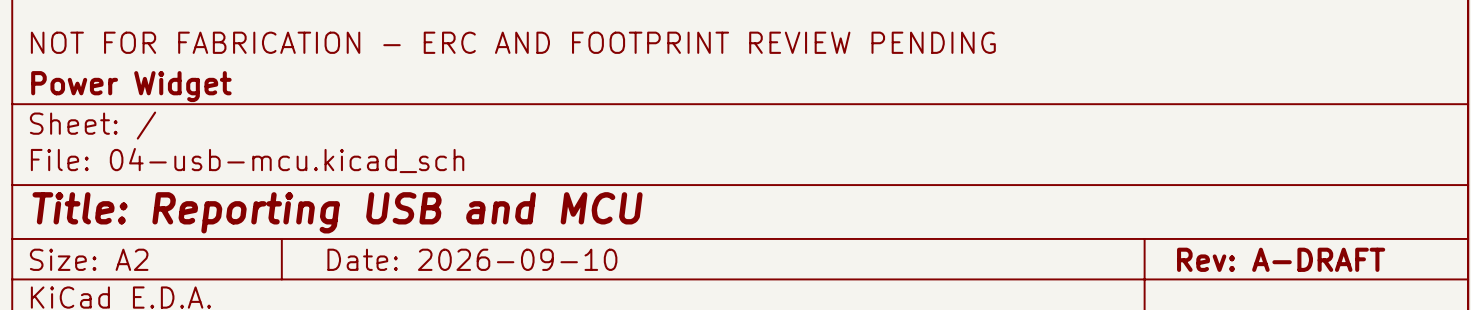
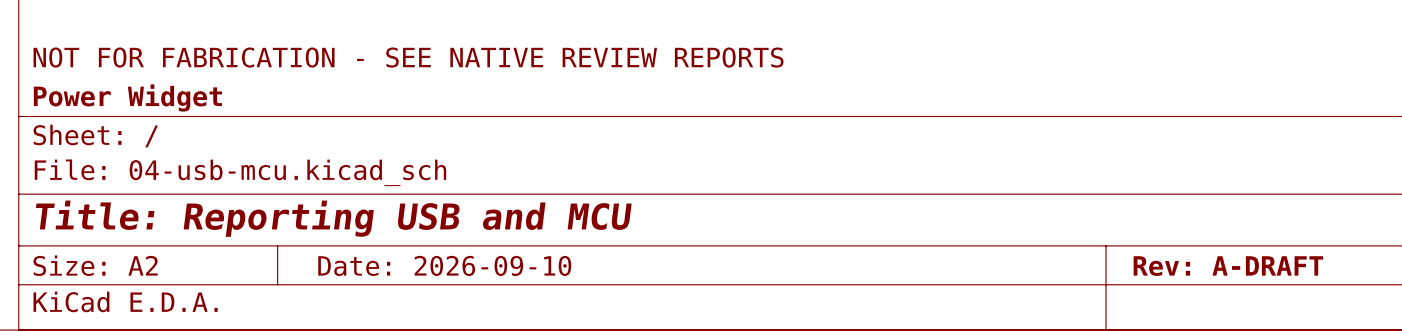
title block: NOT FOR FABRICATION - ERC AND FOOTPRINT REVIEW PENDING (513, 42) -> NOT FOR FABRICATION - SEE NATIVE REVIEW REPORTS (408, 57)

